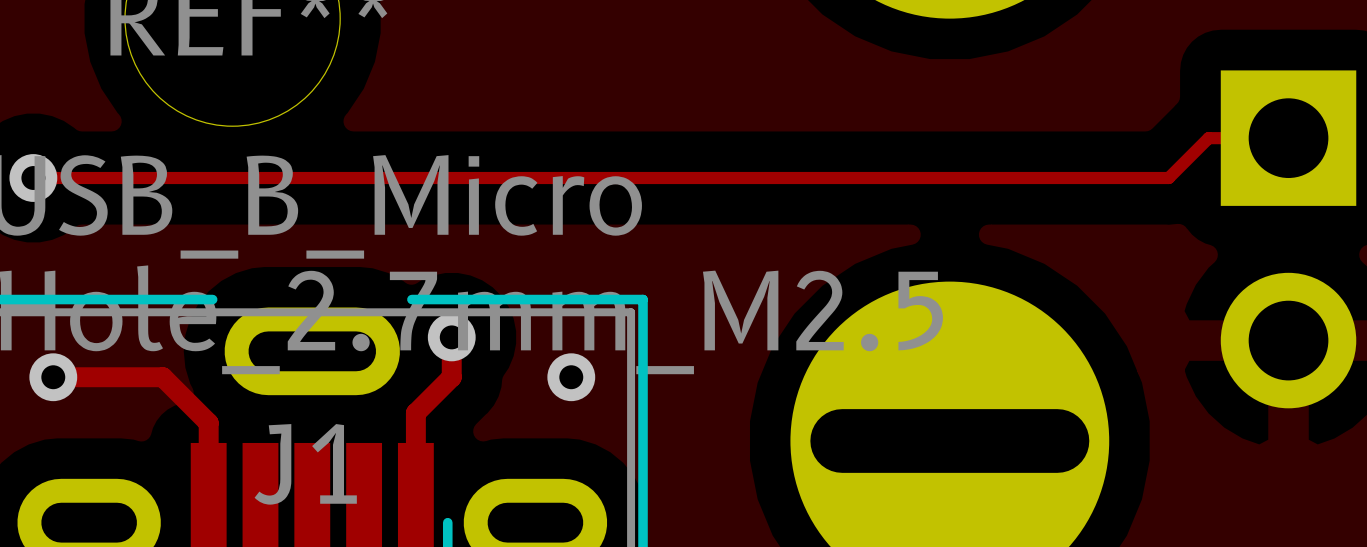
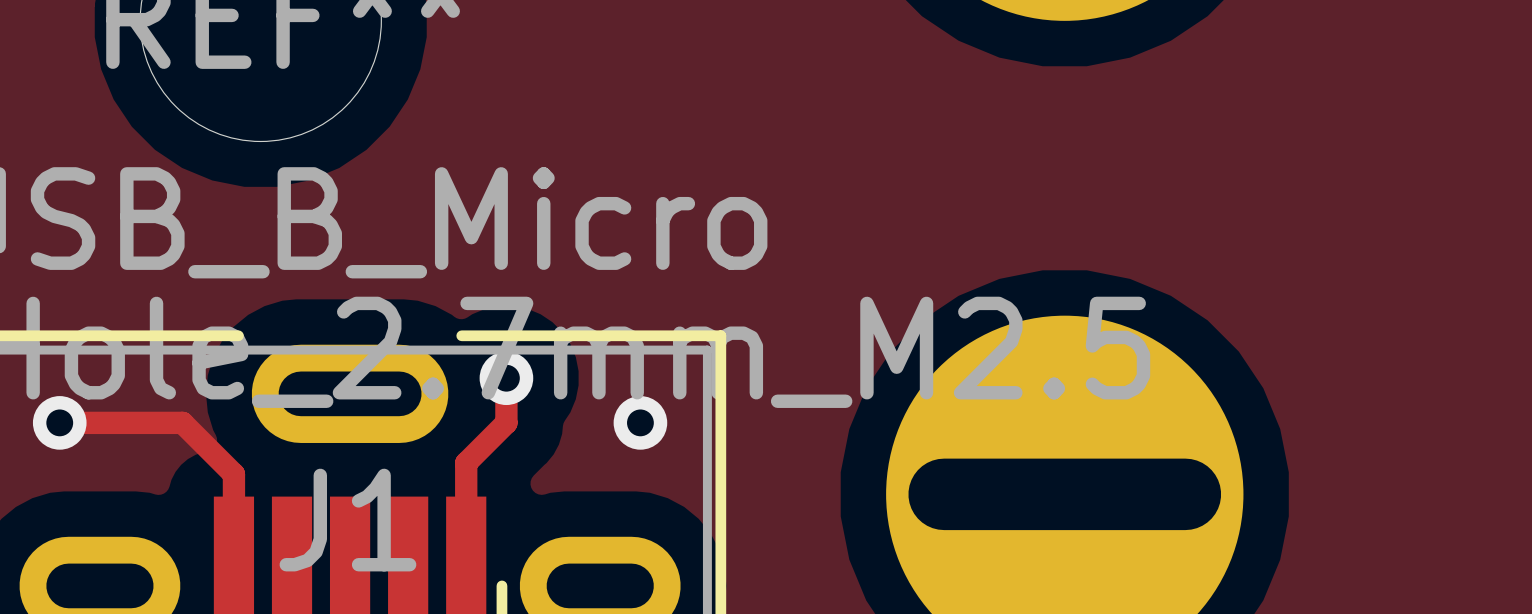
track: (1288, 138) (1208, 138) (1168, 178) (33, 178) -> none
via: (33, 178) -> none
part: (1288, 239) -> none

